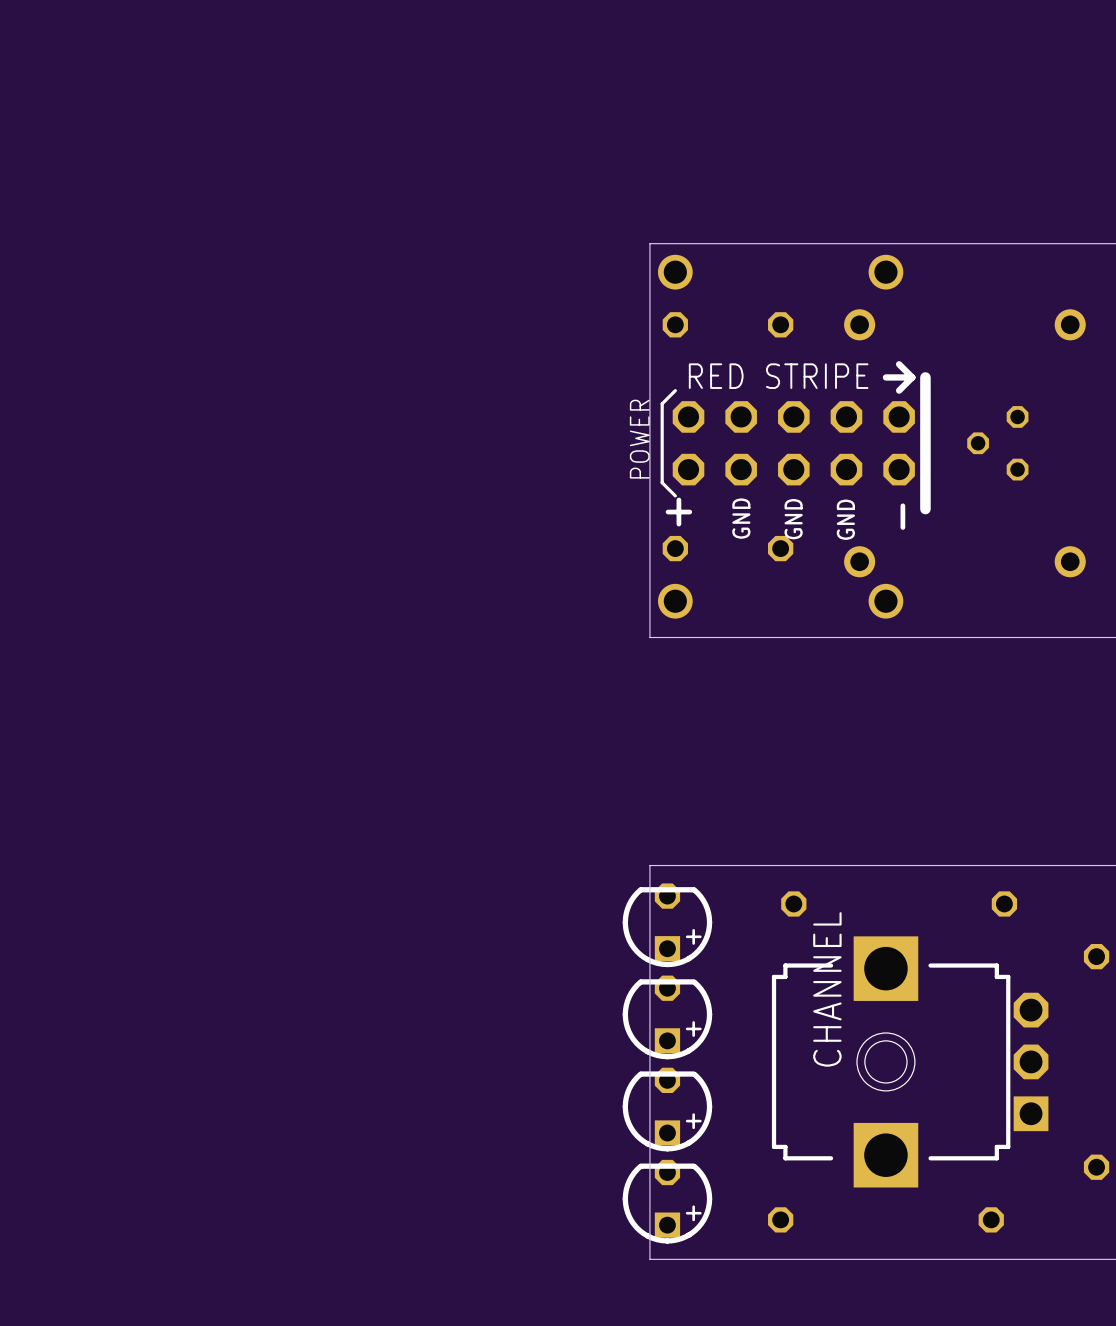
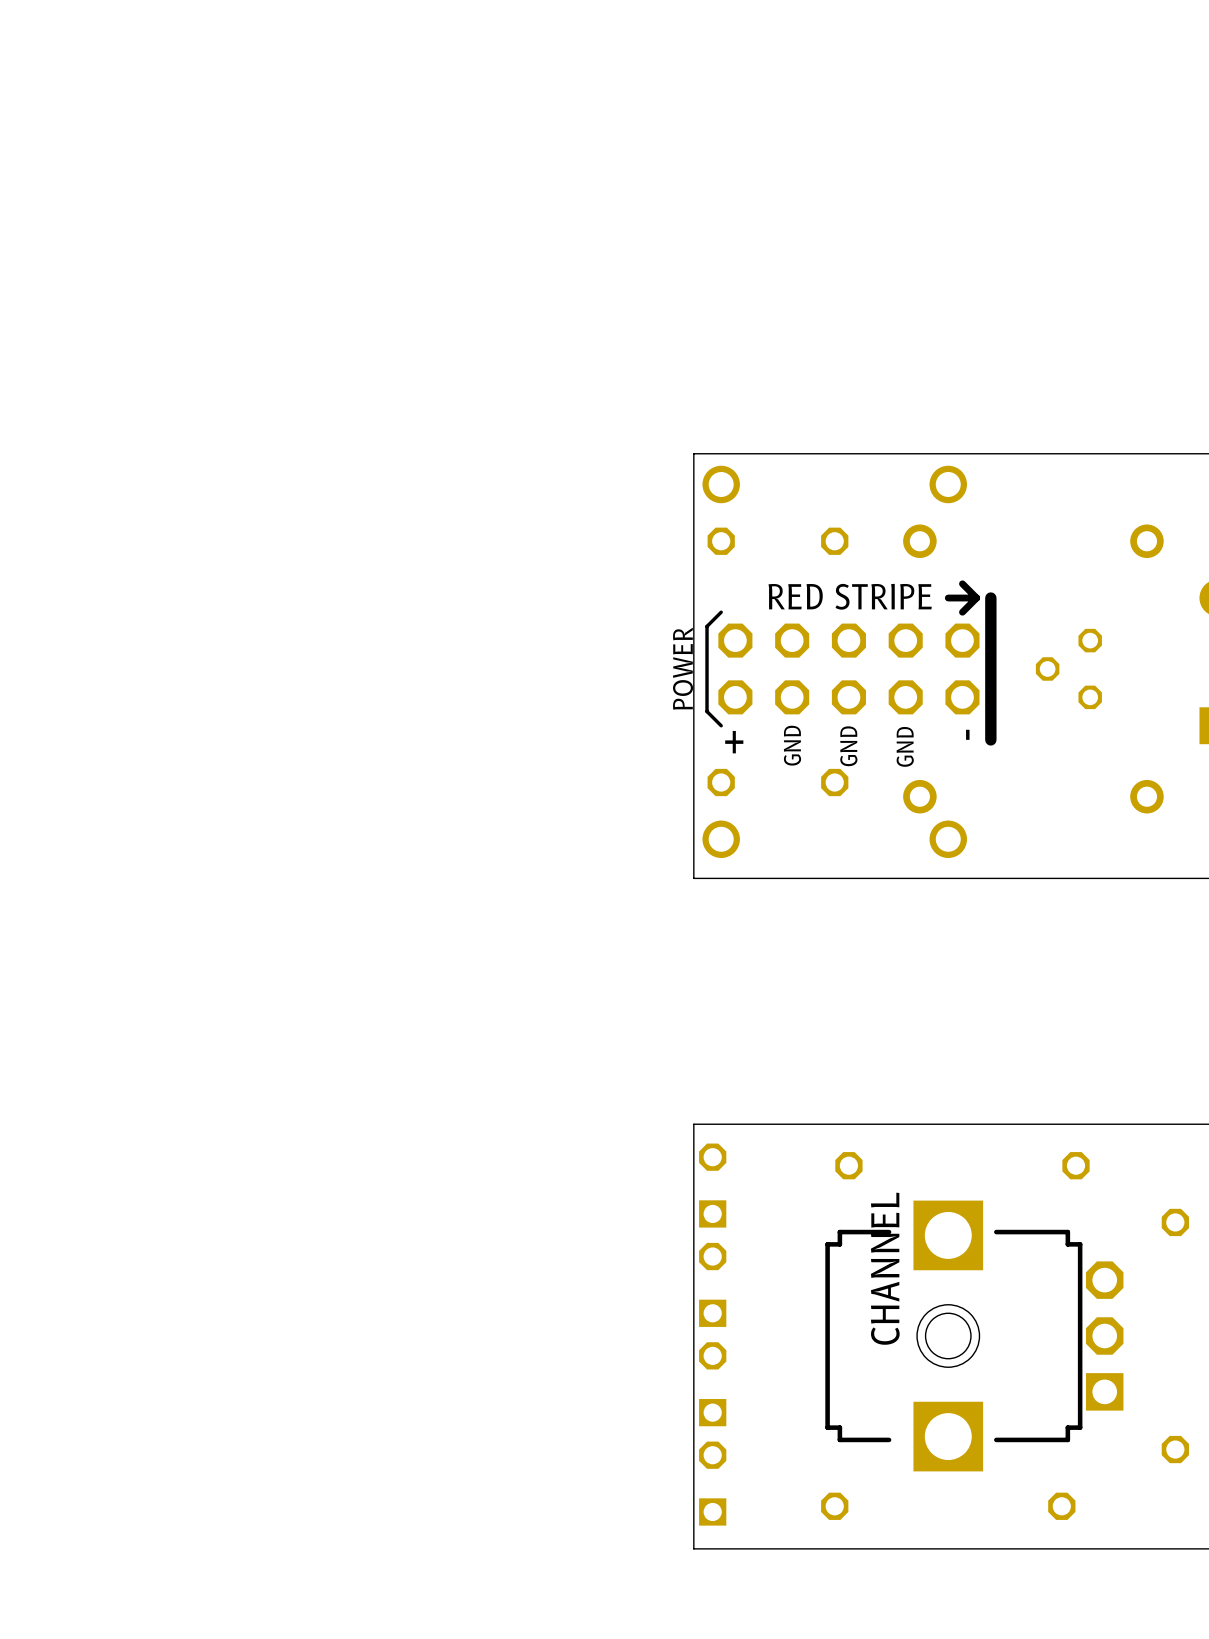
part side: bottom (667, 925) -> top (712, 1185)
part side: bottom (667, 1017) -> top (712, 1284)
part side: bottom (667, 1109) -> top (712, 1384)
part side: bottom (667, 1201) -> top (712, 1483)

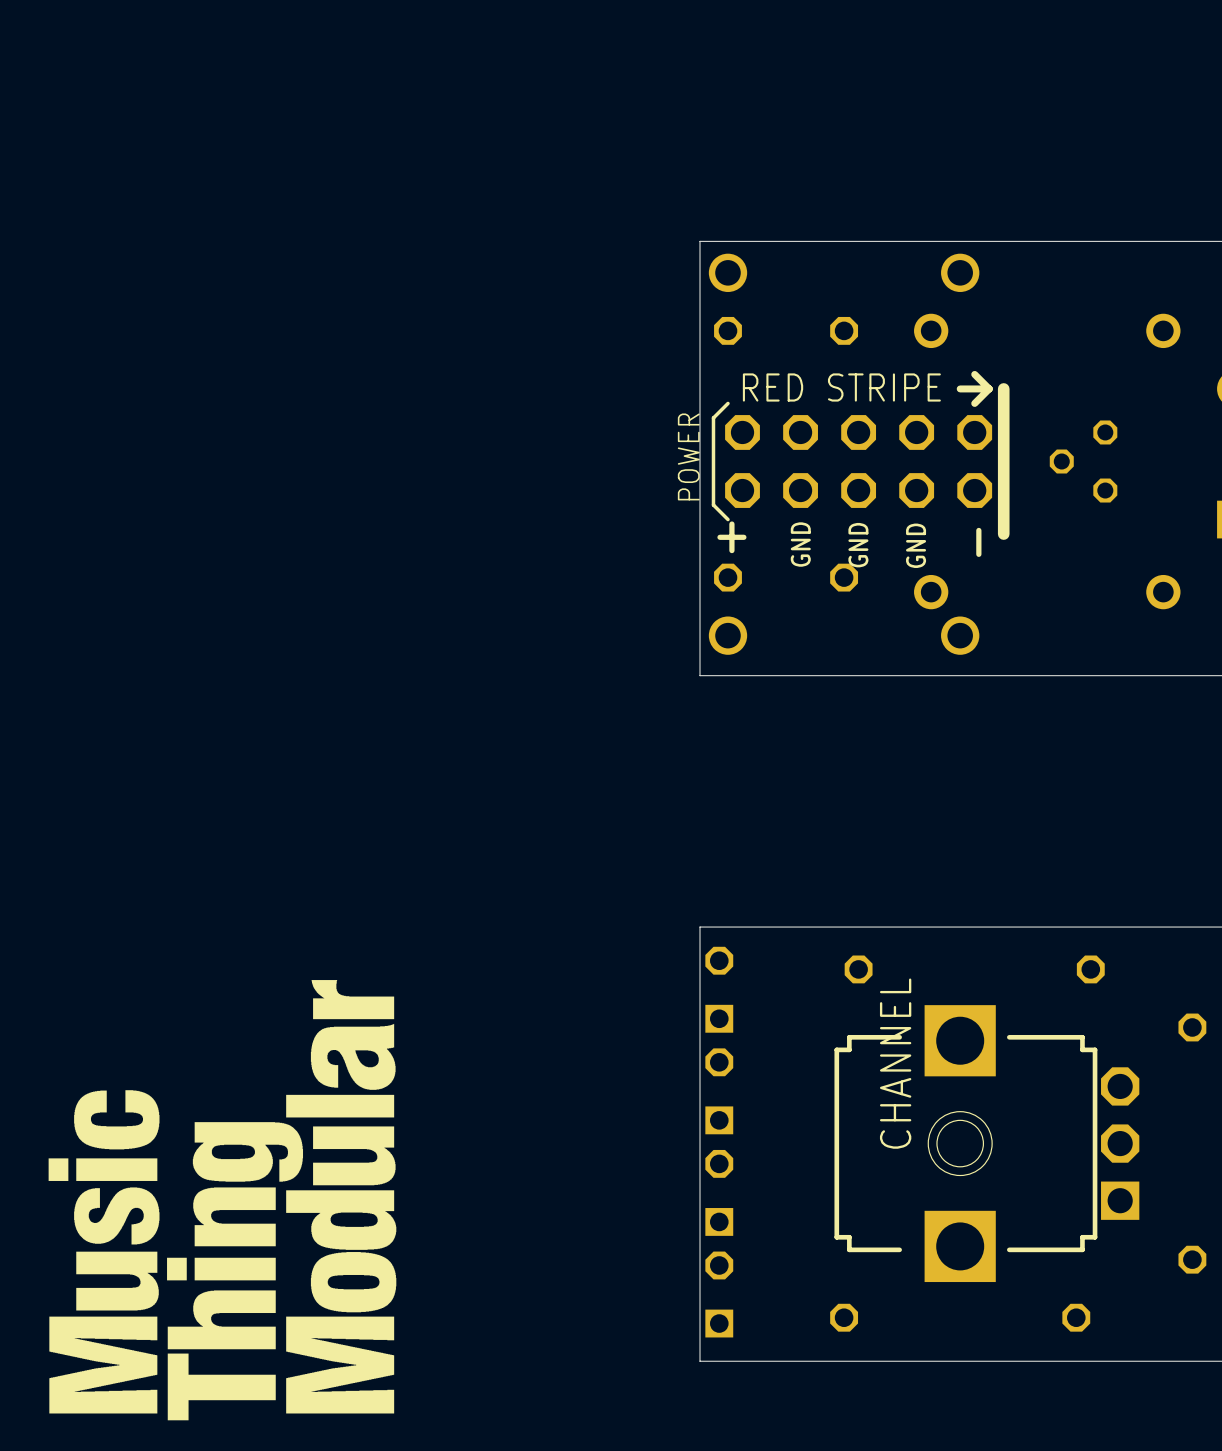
drawing: none -> [48, 980, 397, 1421]

